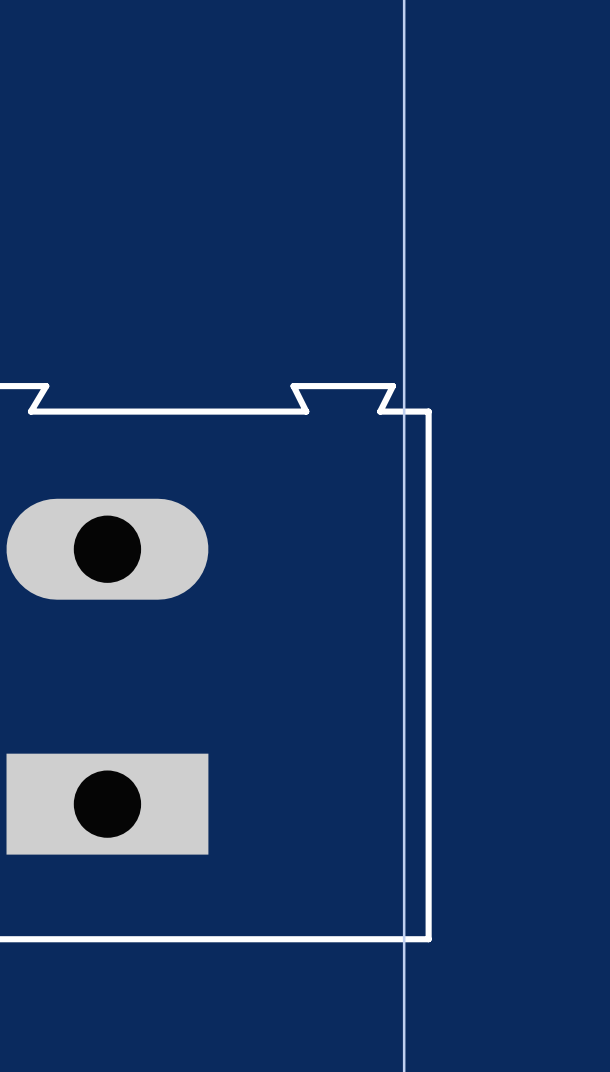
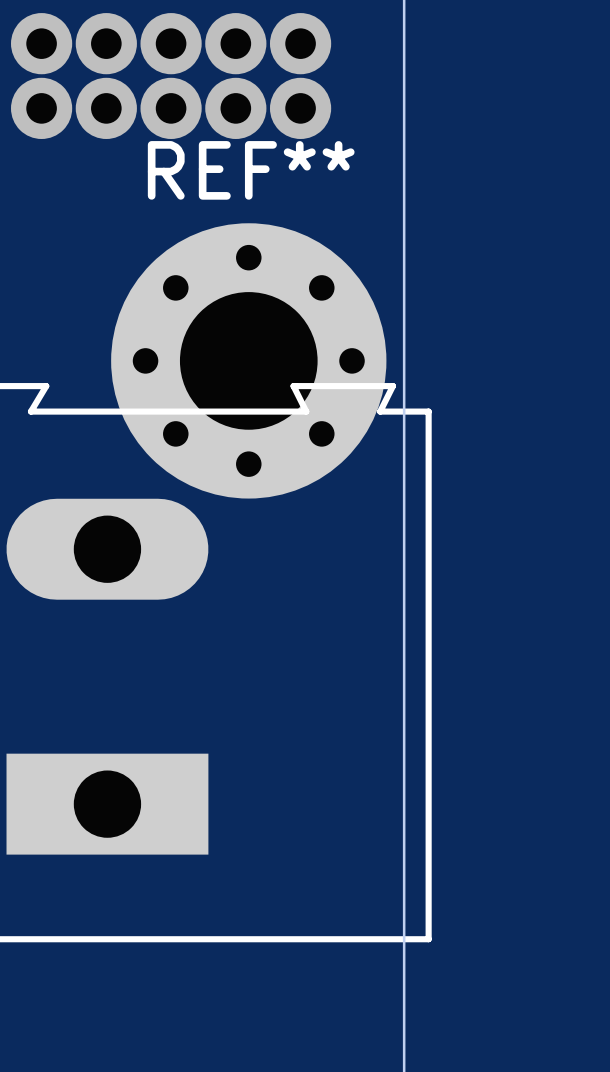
via: none -> (41, 43)
via: none -> (106, 43)
via: none -> (171, 43)
via: none -> (235, 43)
via: none -> (300, 43)
via: none -> (41, 108)
via: none -> (106, 108)
via: none -> (171, 108)
via: none -> (235, 108)
via: none -> (300, 108)
REF**: none -> (248, 360)

